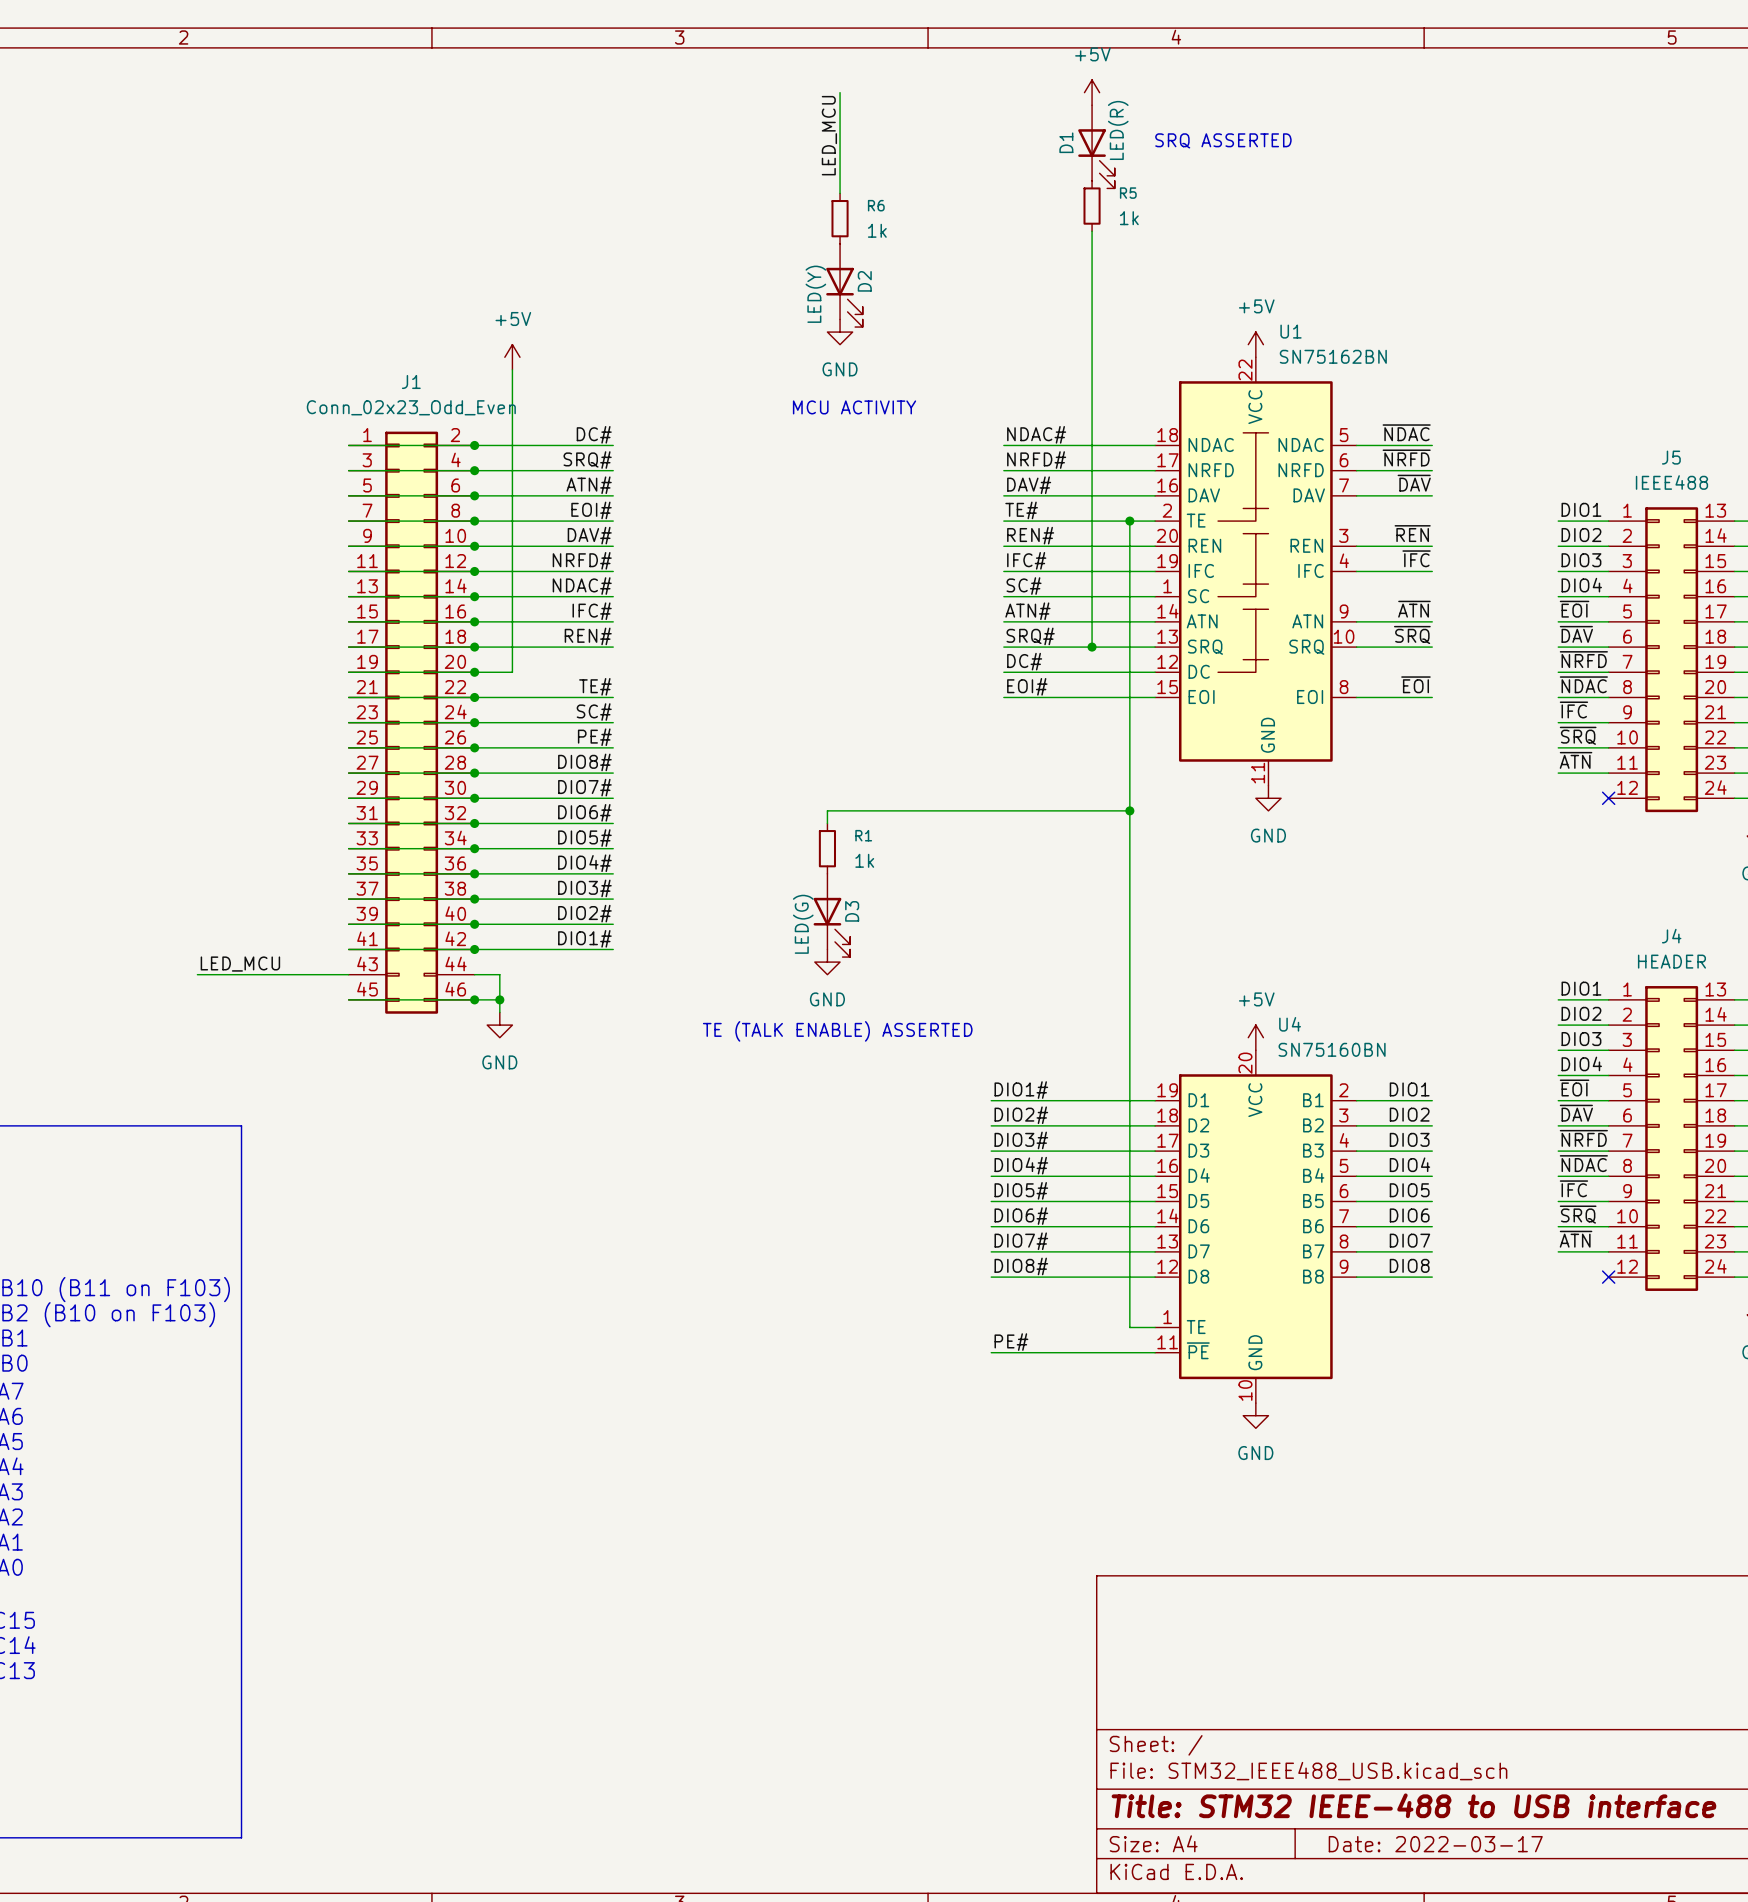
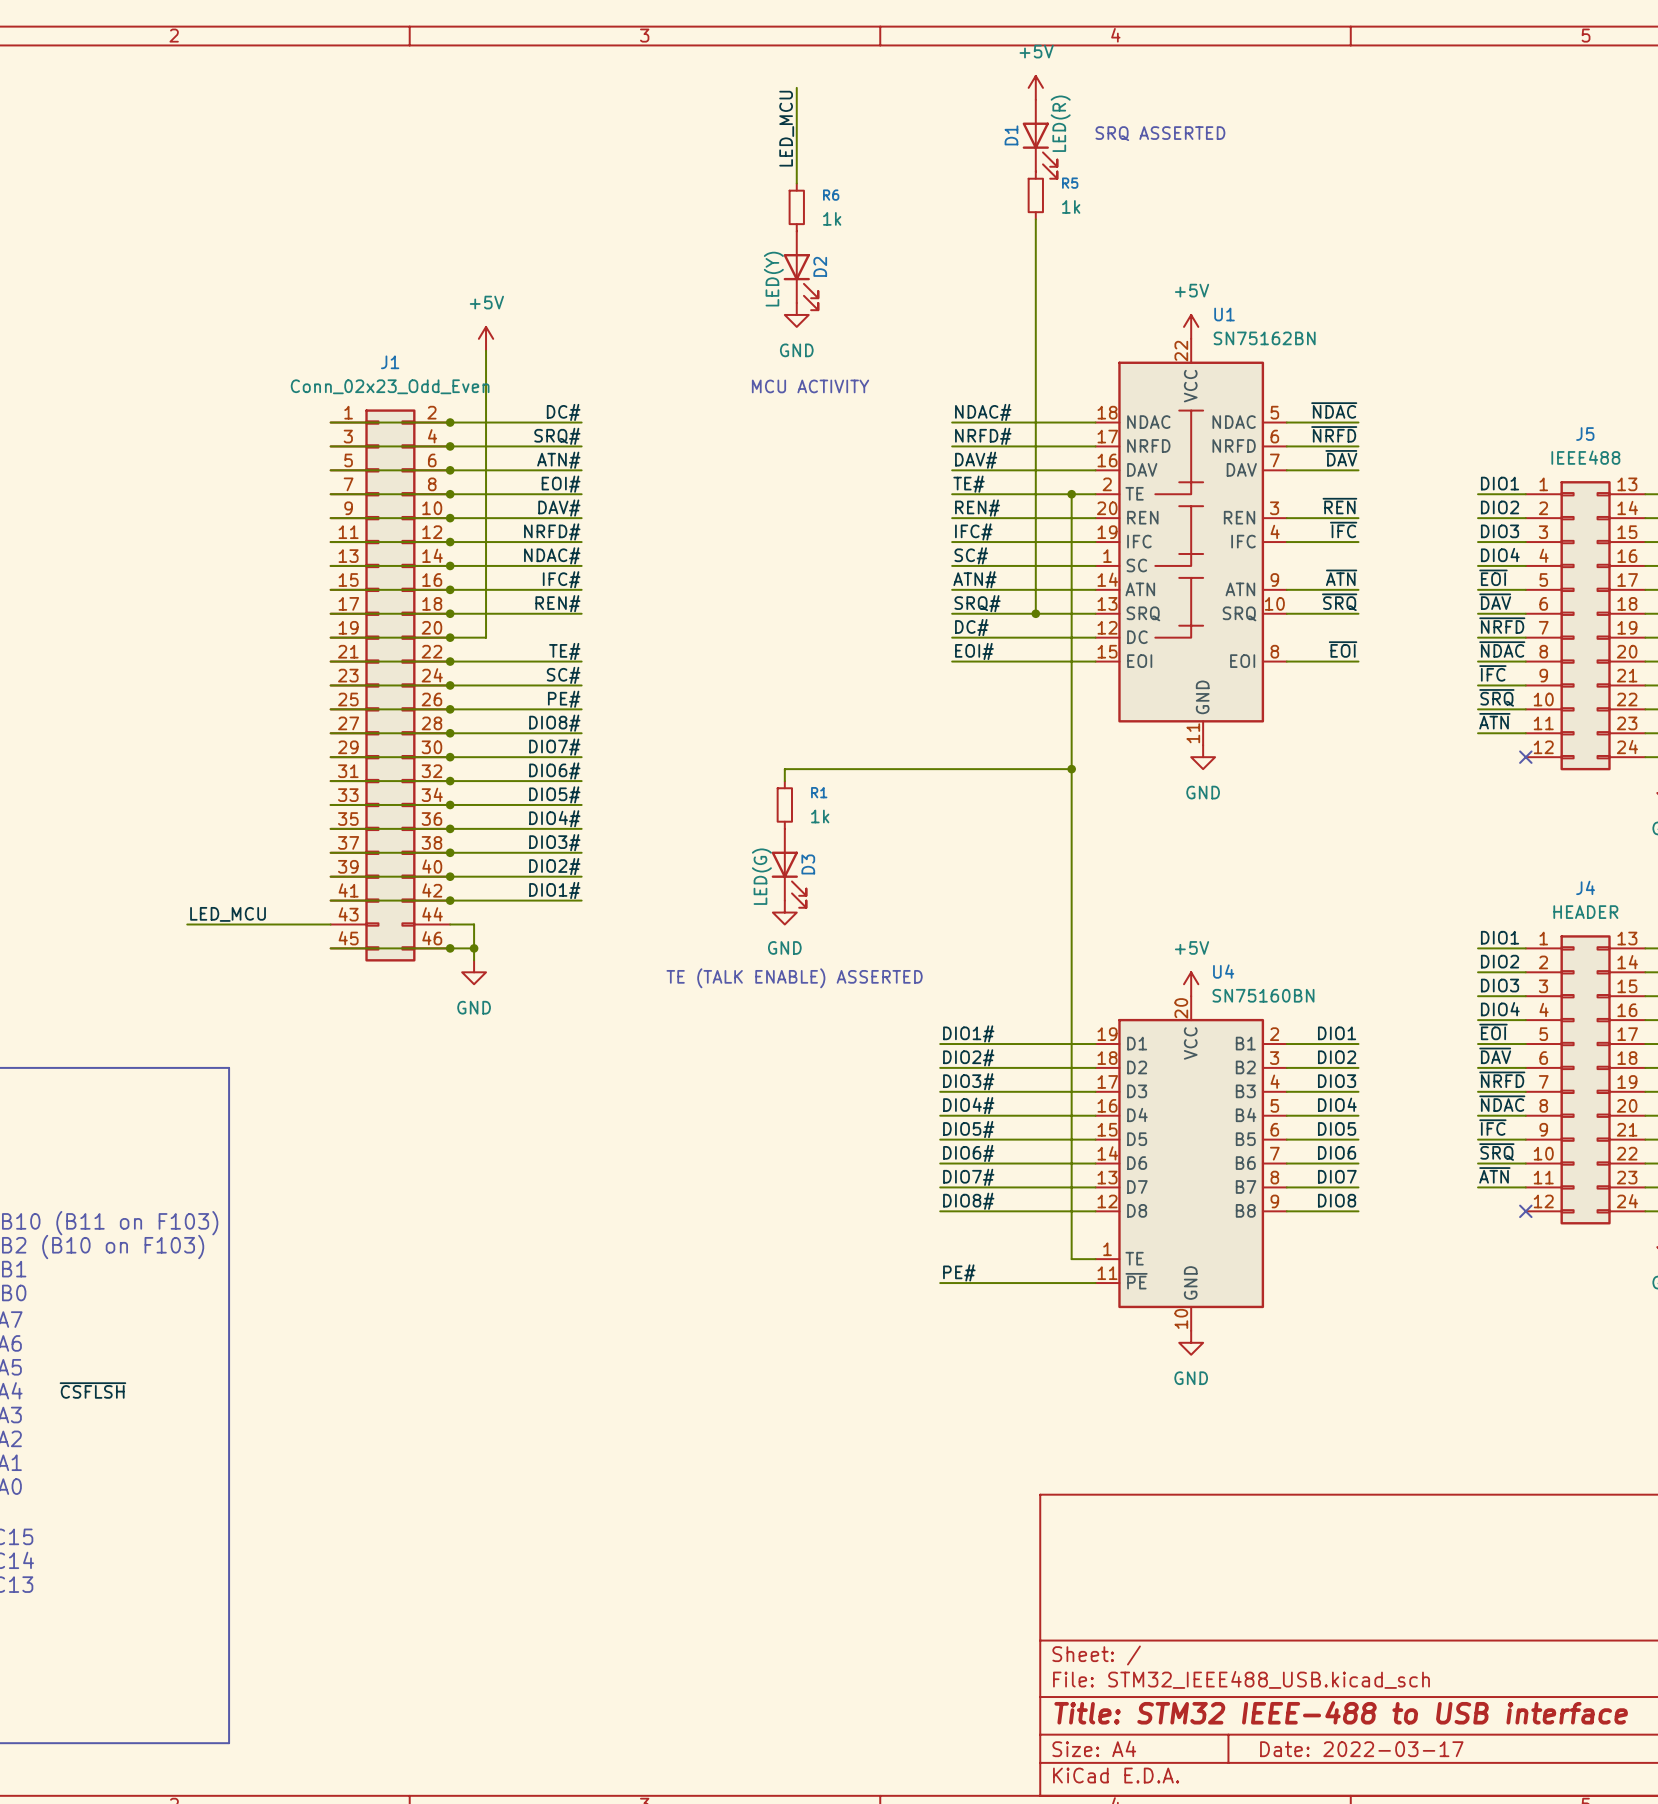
label: none -> ~{CSFLSH} (92, 1390)

